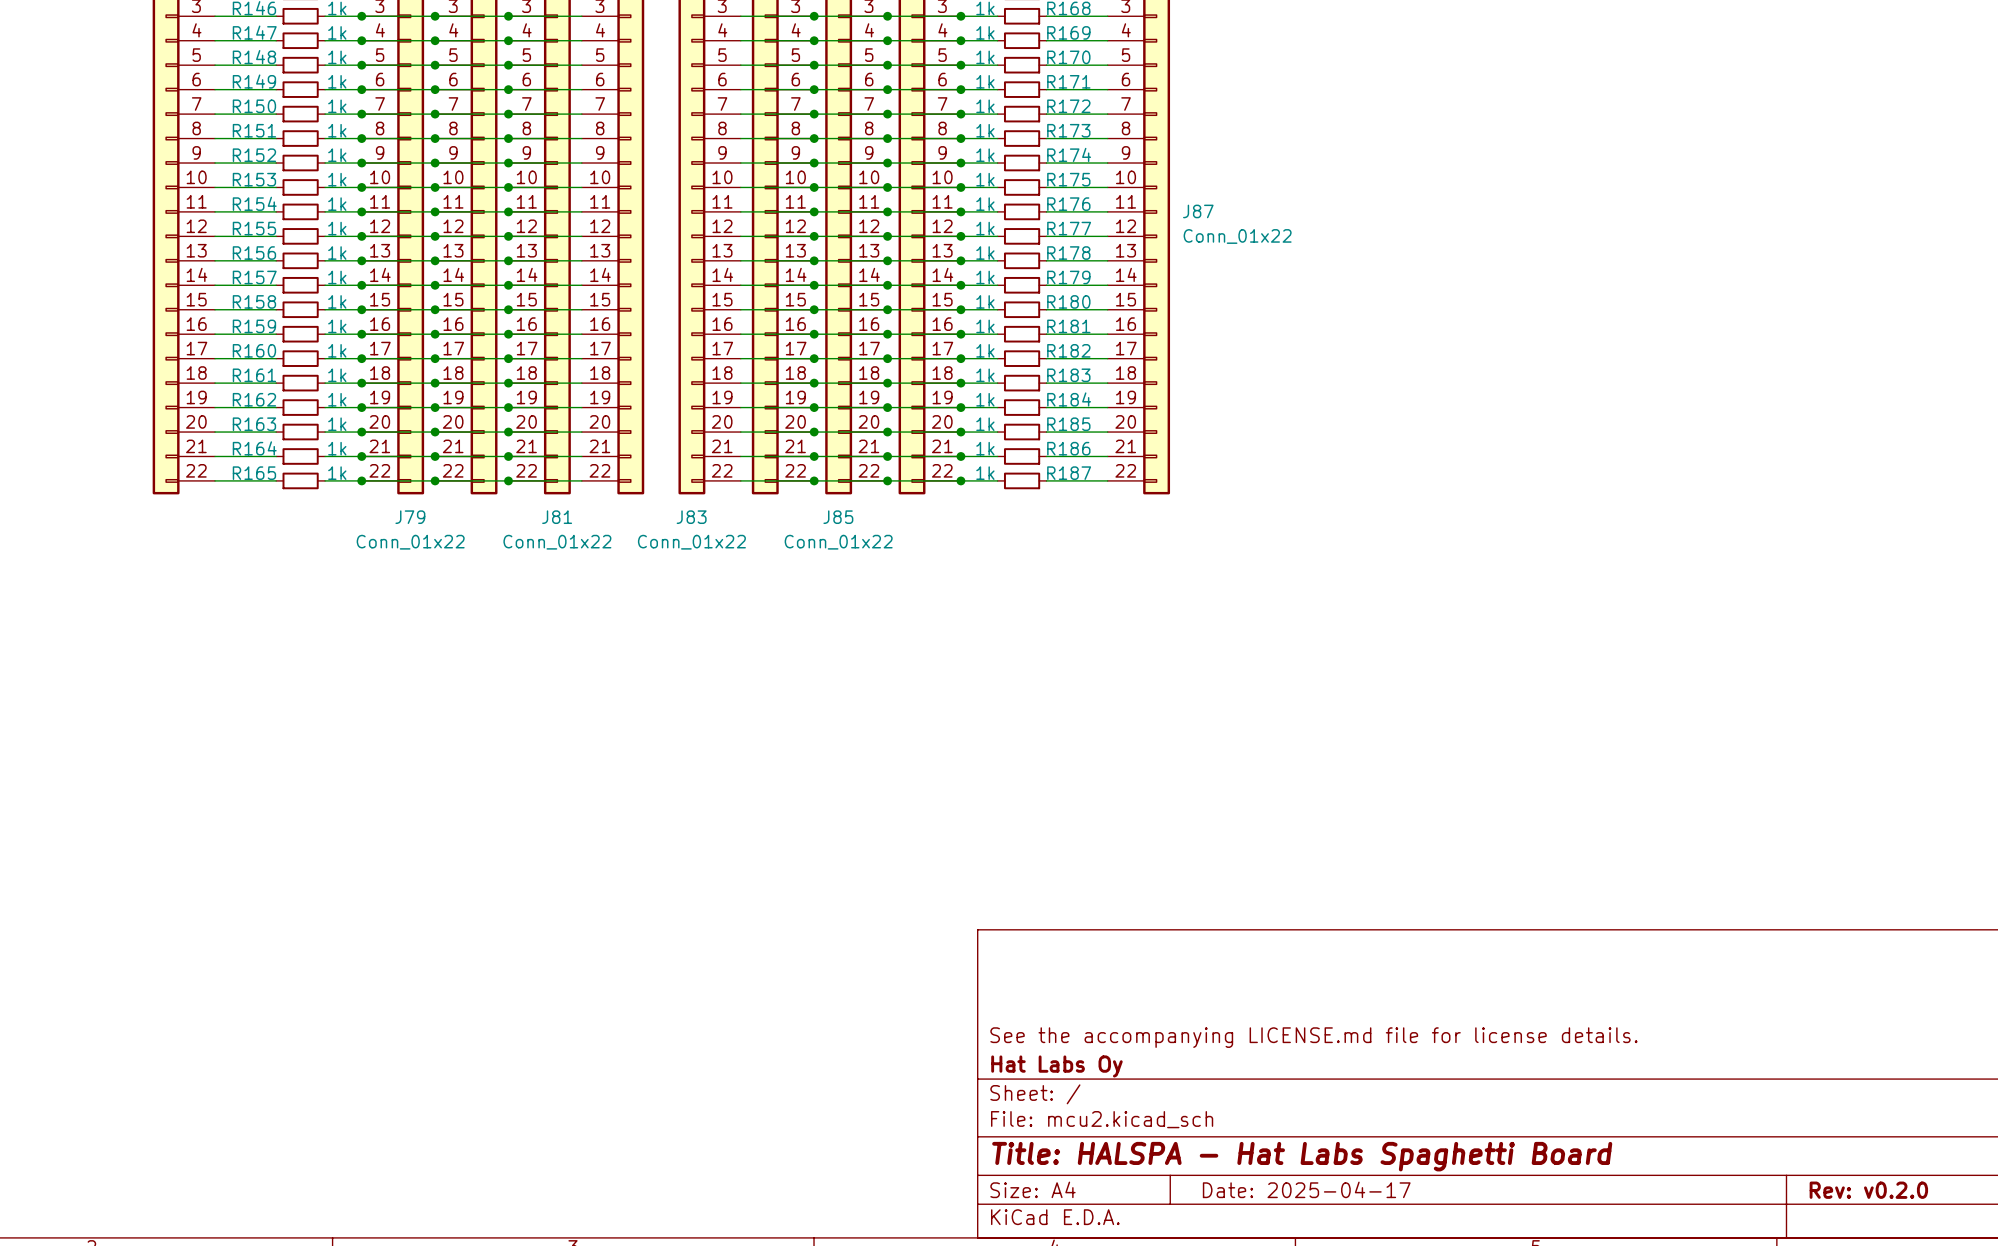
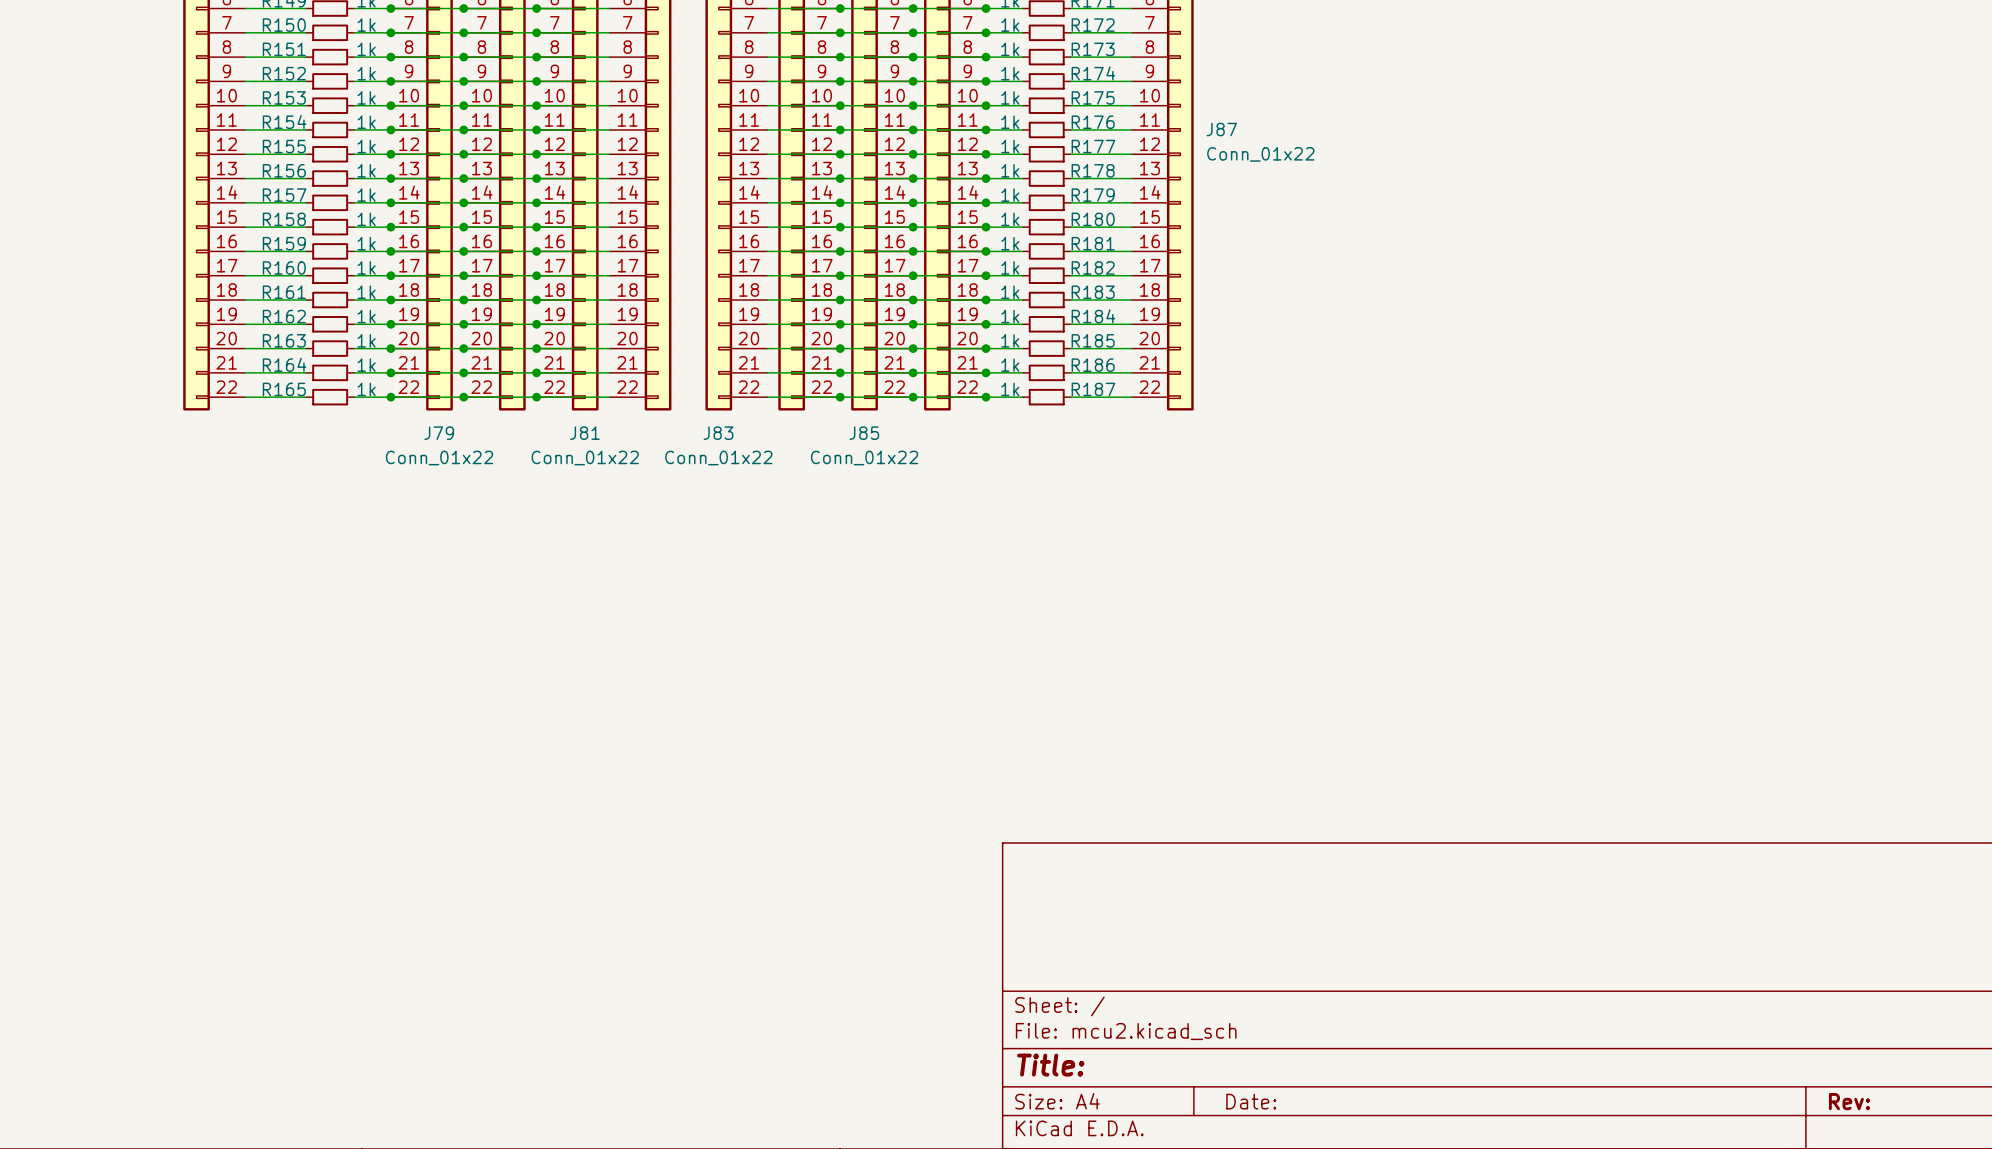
title block: See the accompanying LICENSE.md file for license details. (1313, 1037) -> none
title block: Hat Labs Oy (1056, 1066) -> none
title block: Title: HALSPA - Hat Labs Spaghetti Board (1302, 1156) -> Title: (1050, 1065)
title block: Date: 2025-04-17 (1306, 1189) -> Date: (1251, 1101)
title block: Rev: v0.2.0 (1868, 1190) -> Rev: (1849, 1101)

